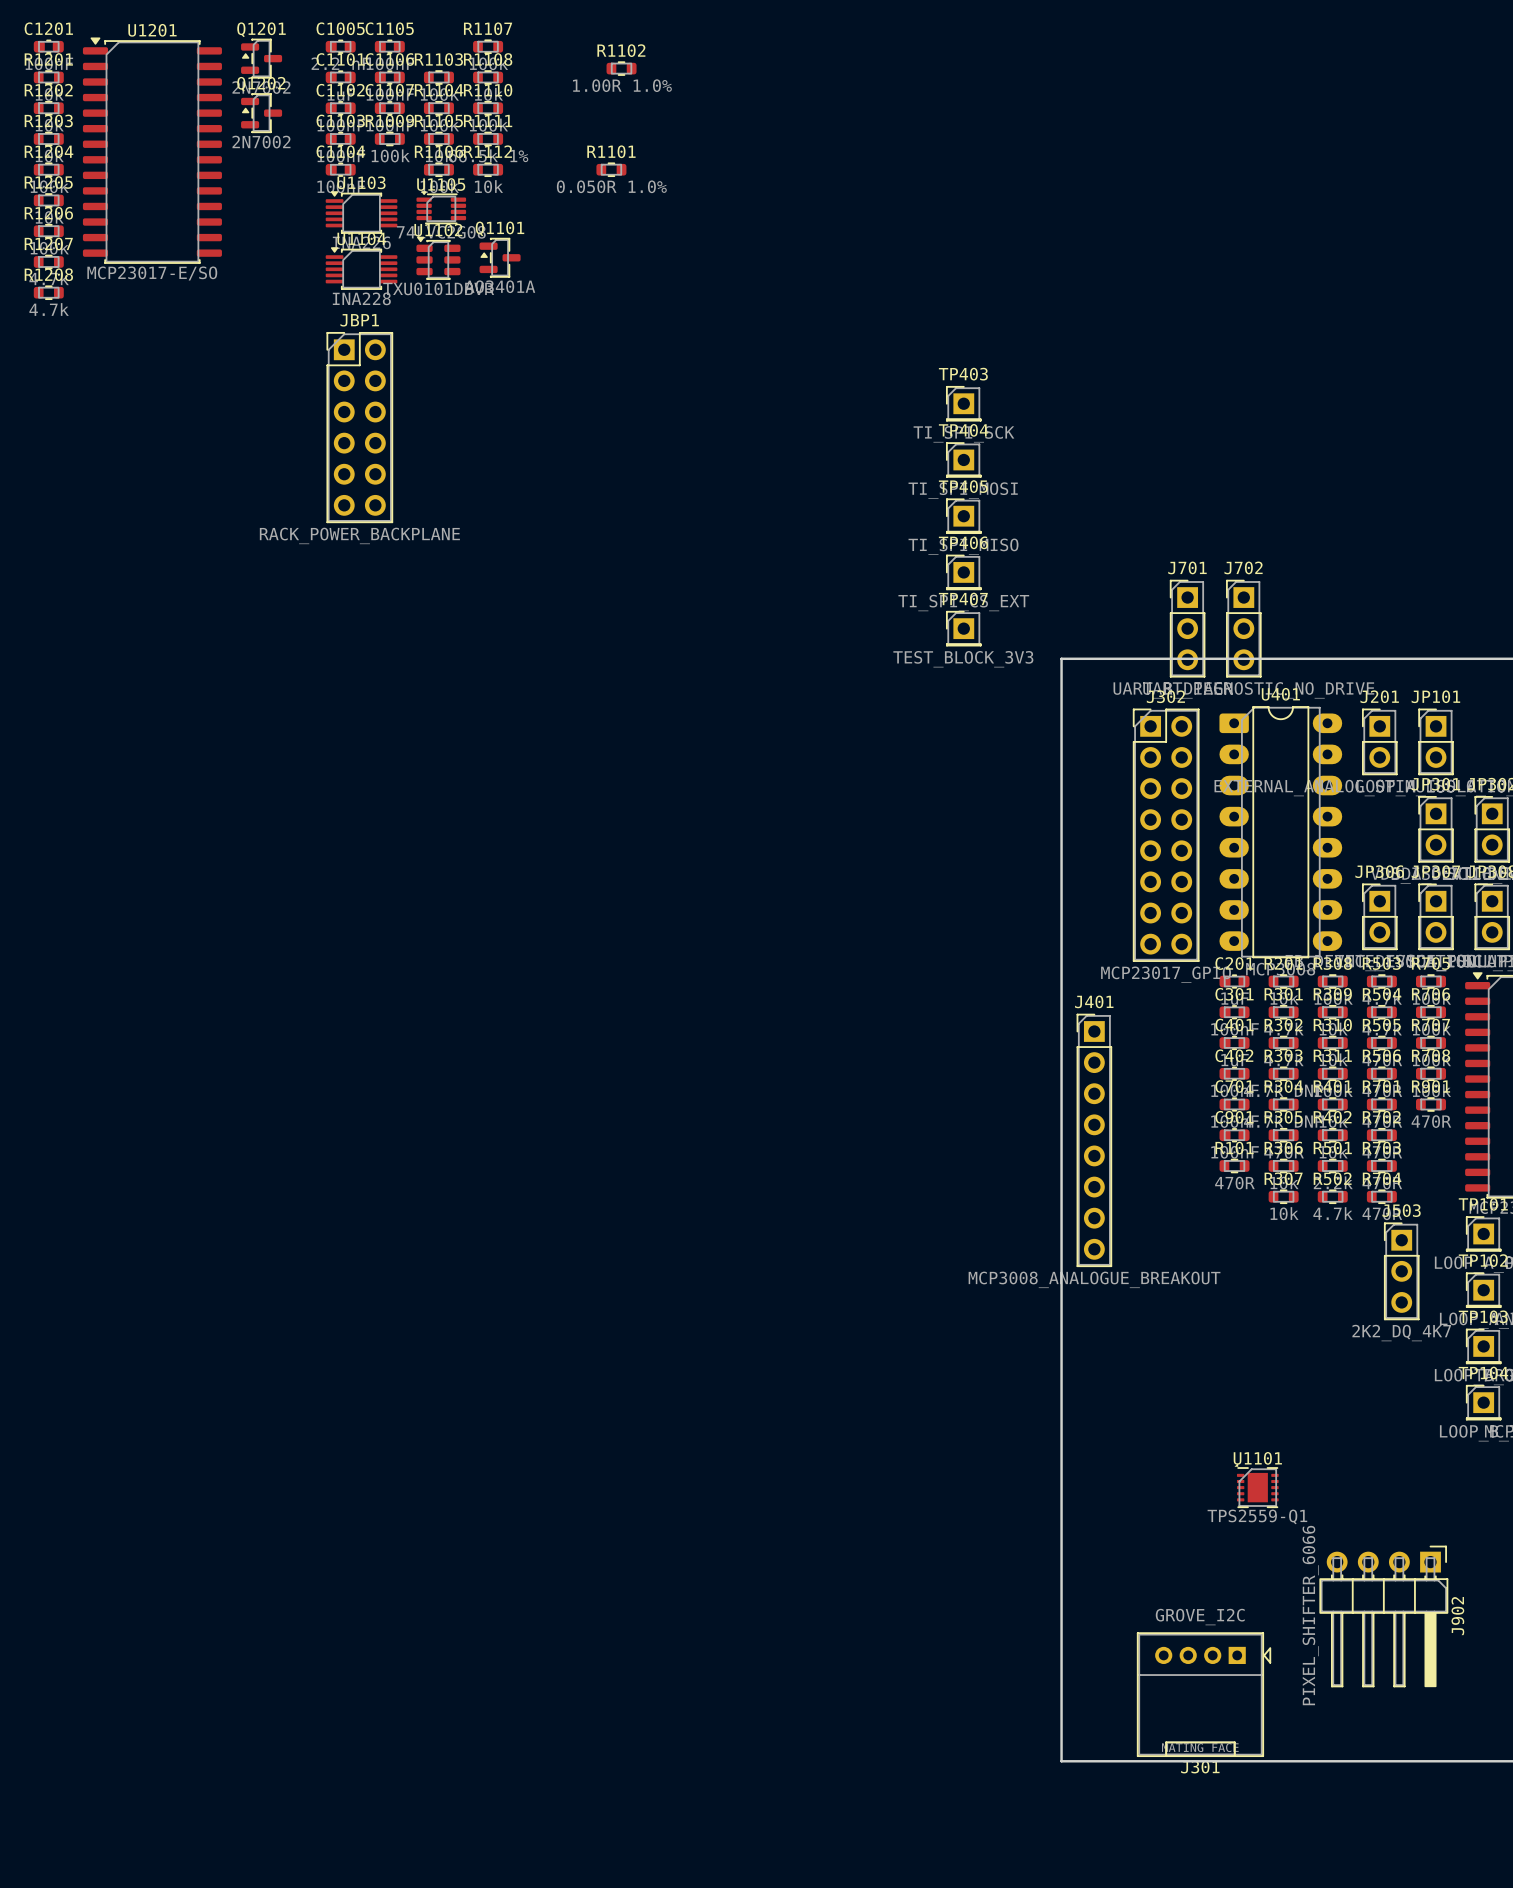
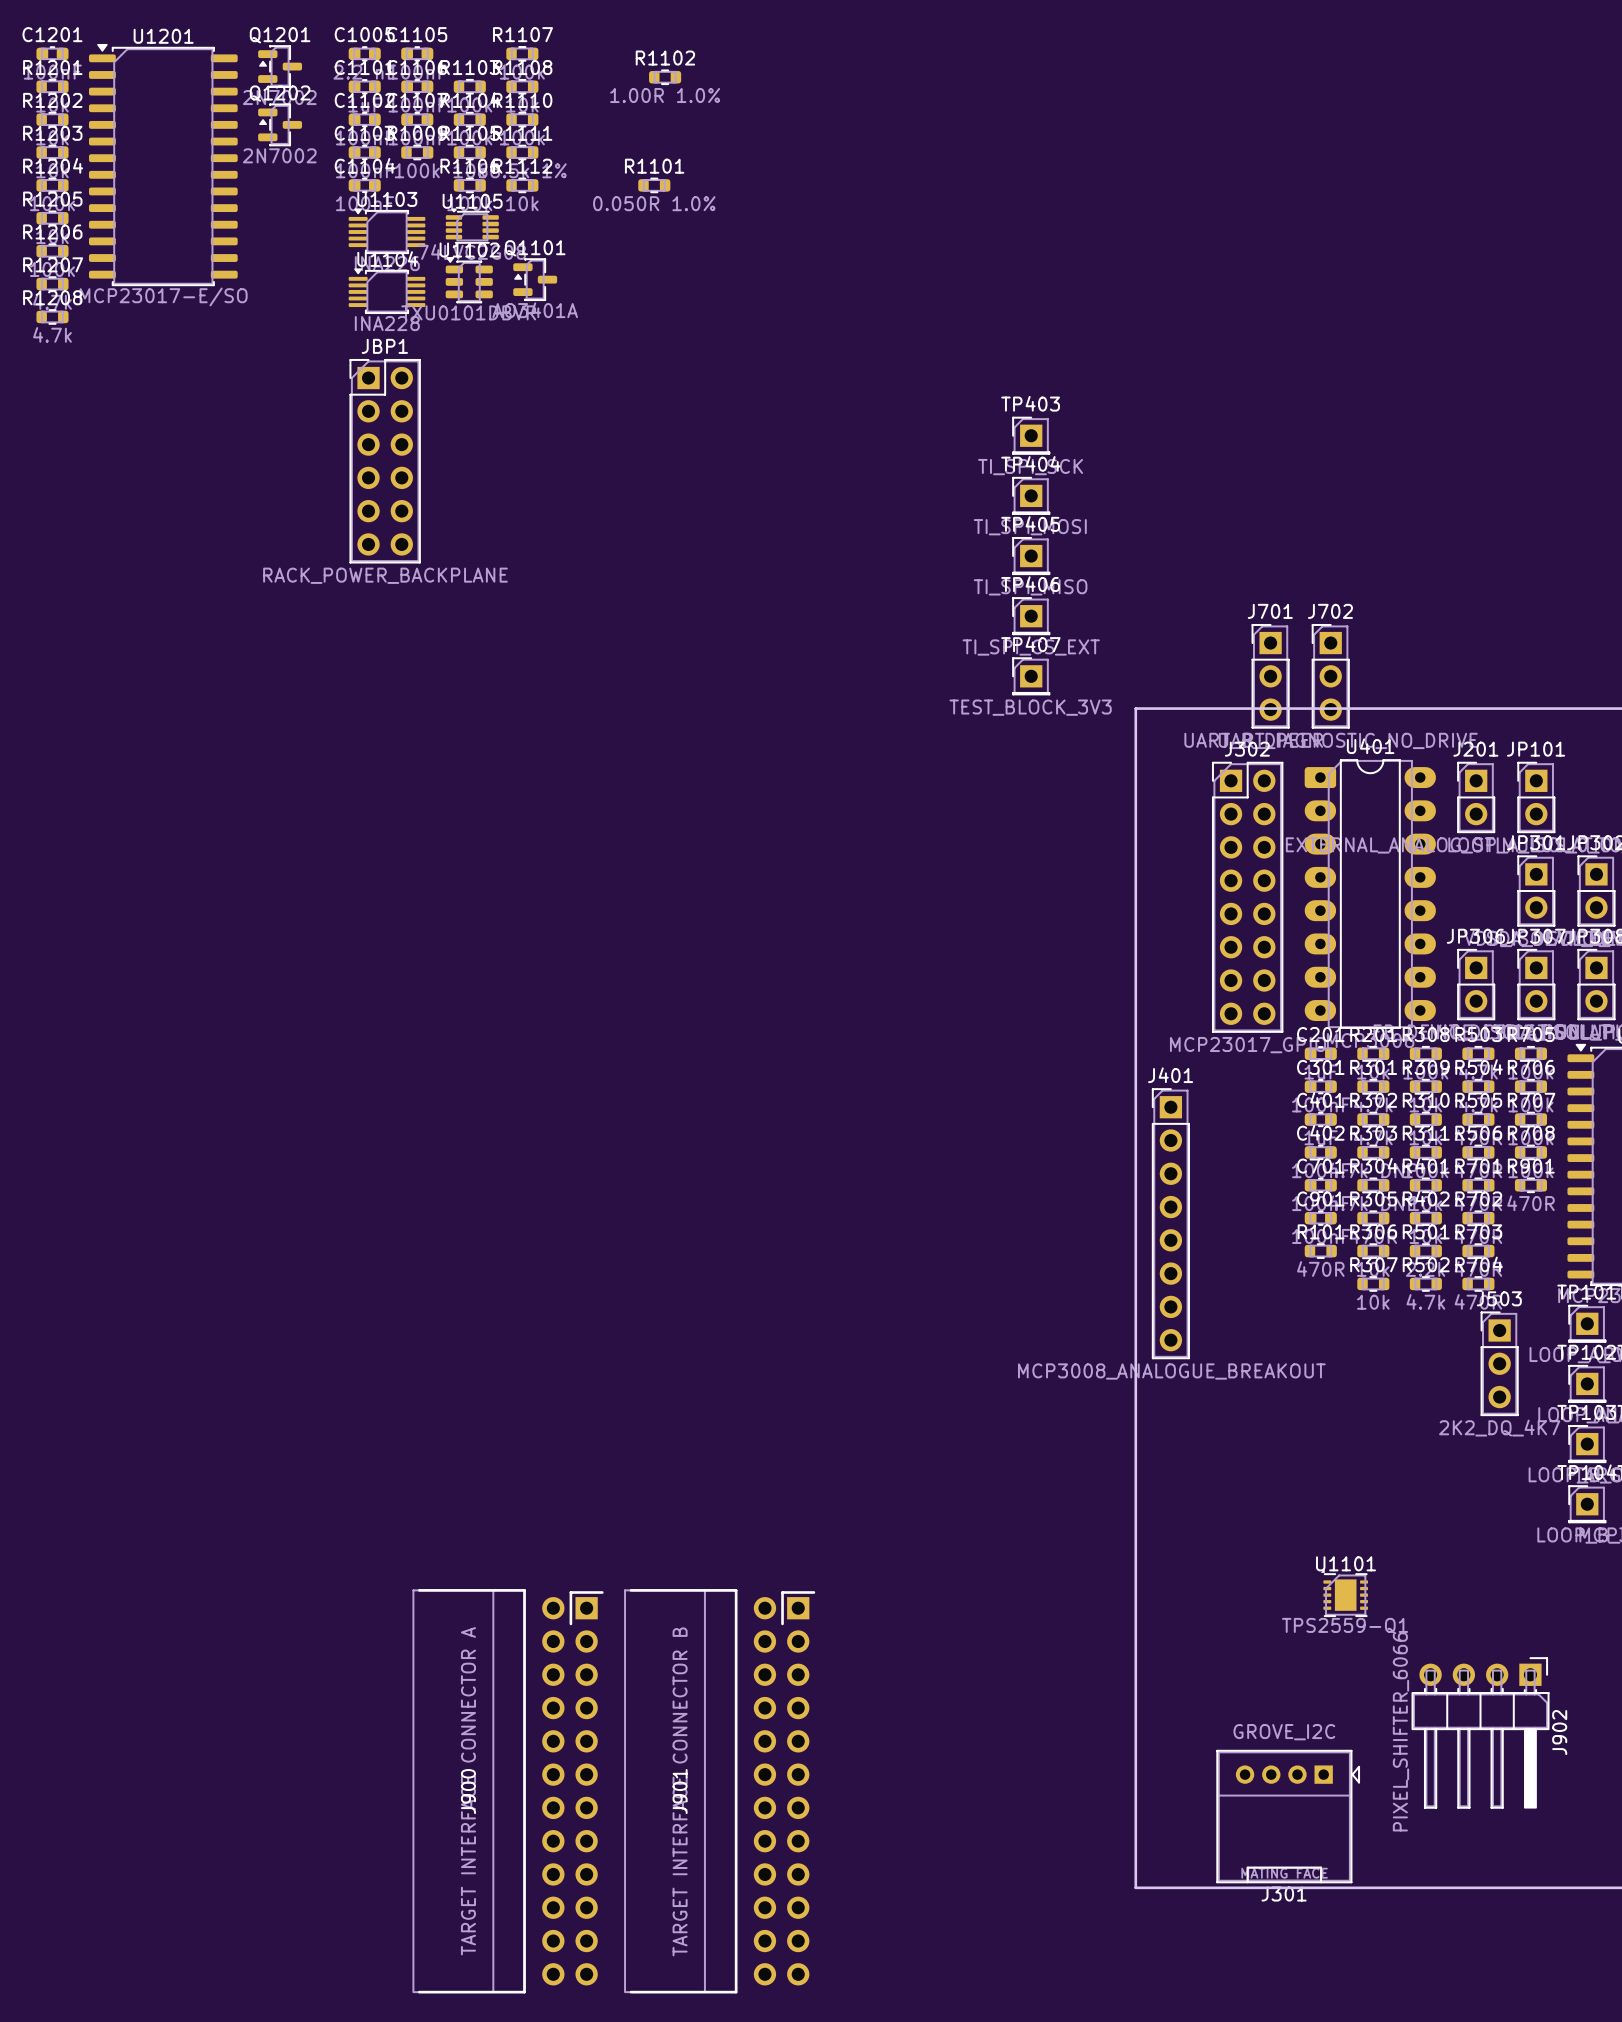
J900: none -> TARGET INTERFACE CONNECTOR A (508, 1791)
J901: none -> TARGET INTERFACE CONNECTOR B (719, 1791)

